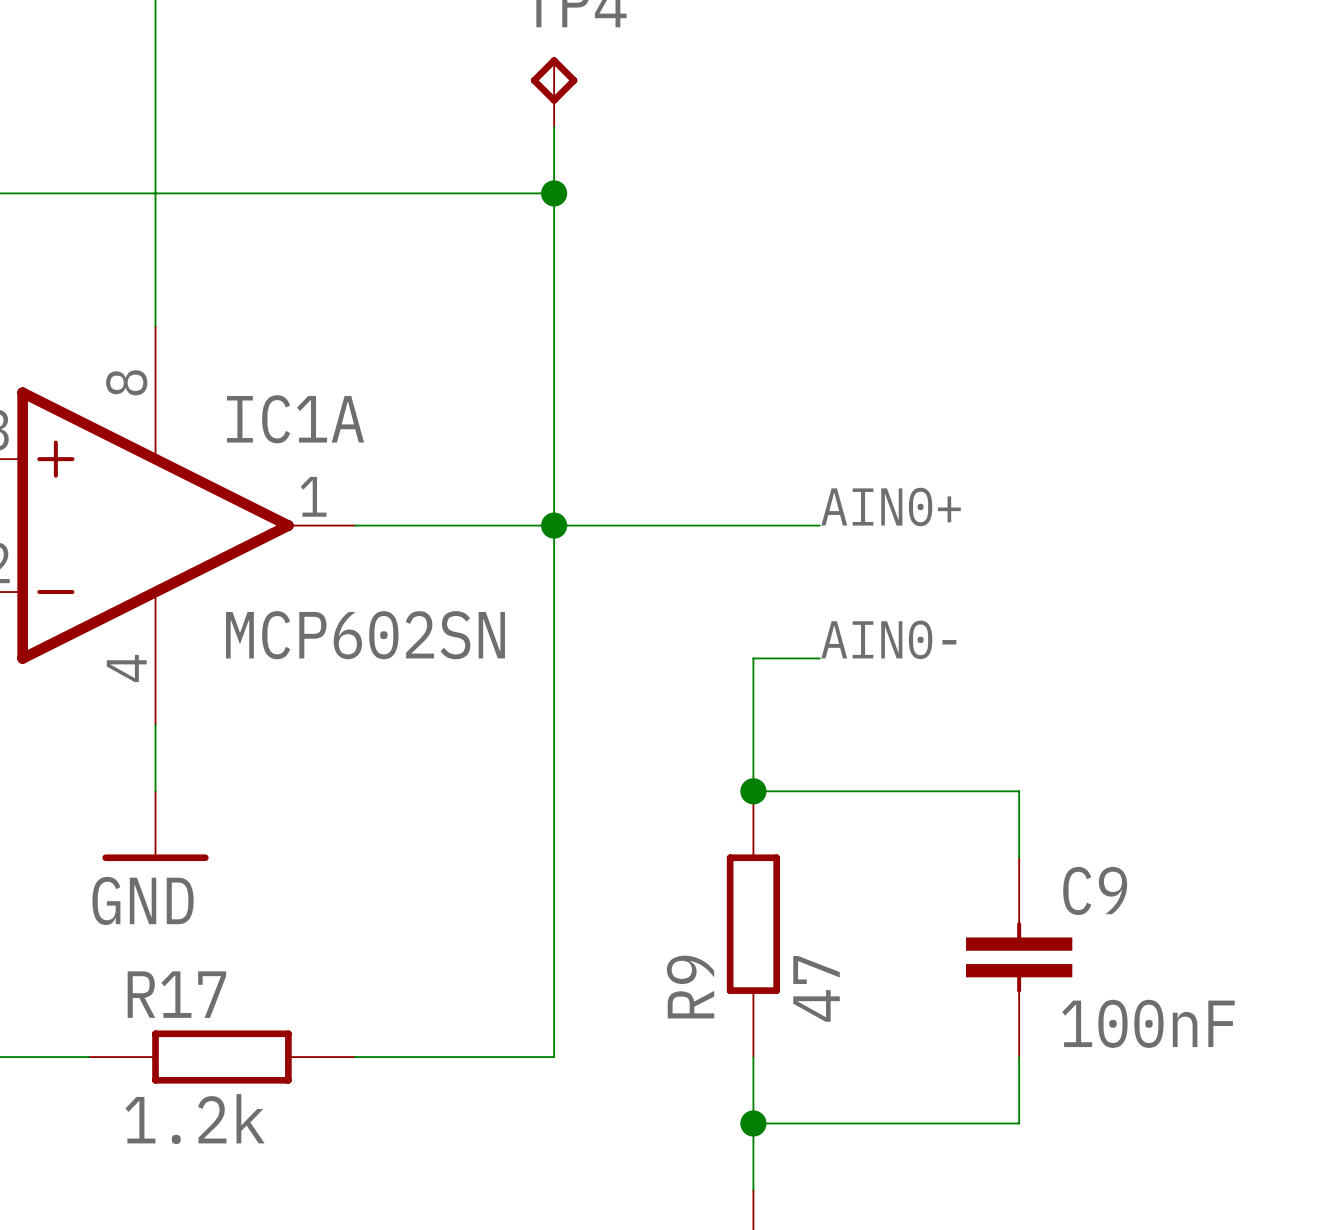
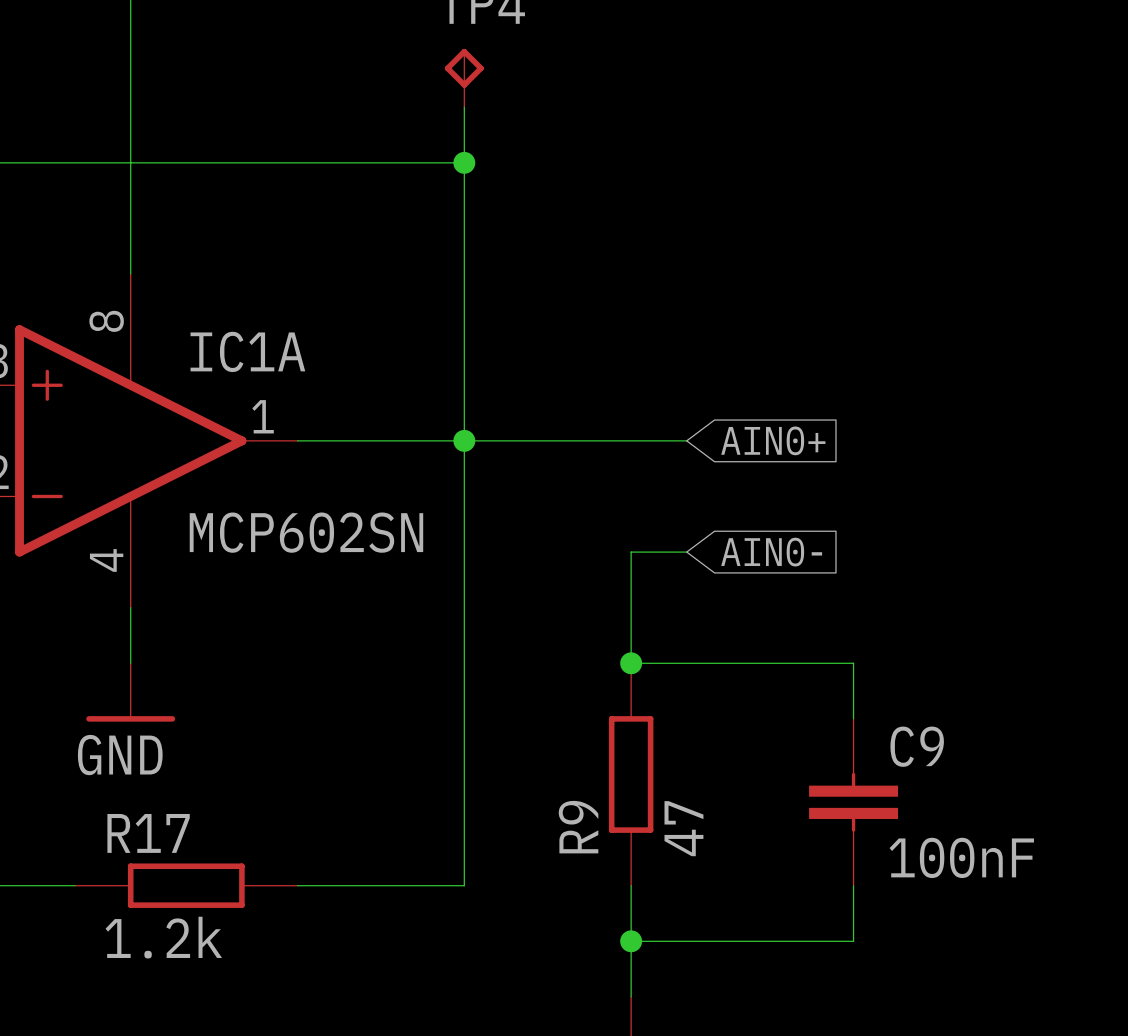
label: AIN0+ (891, 506) -> none
global label: none -> AIN0+ (773, 440)
label: AIN0- (888, 639) -> none
global label: none -> AIN0- (771, 552)

